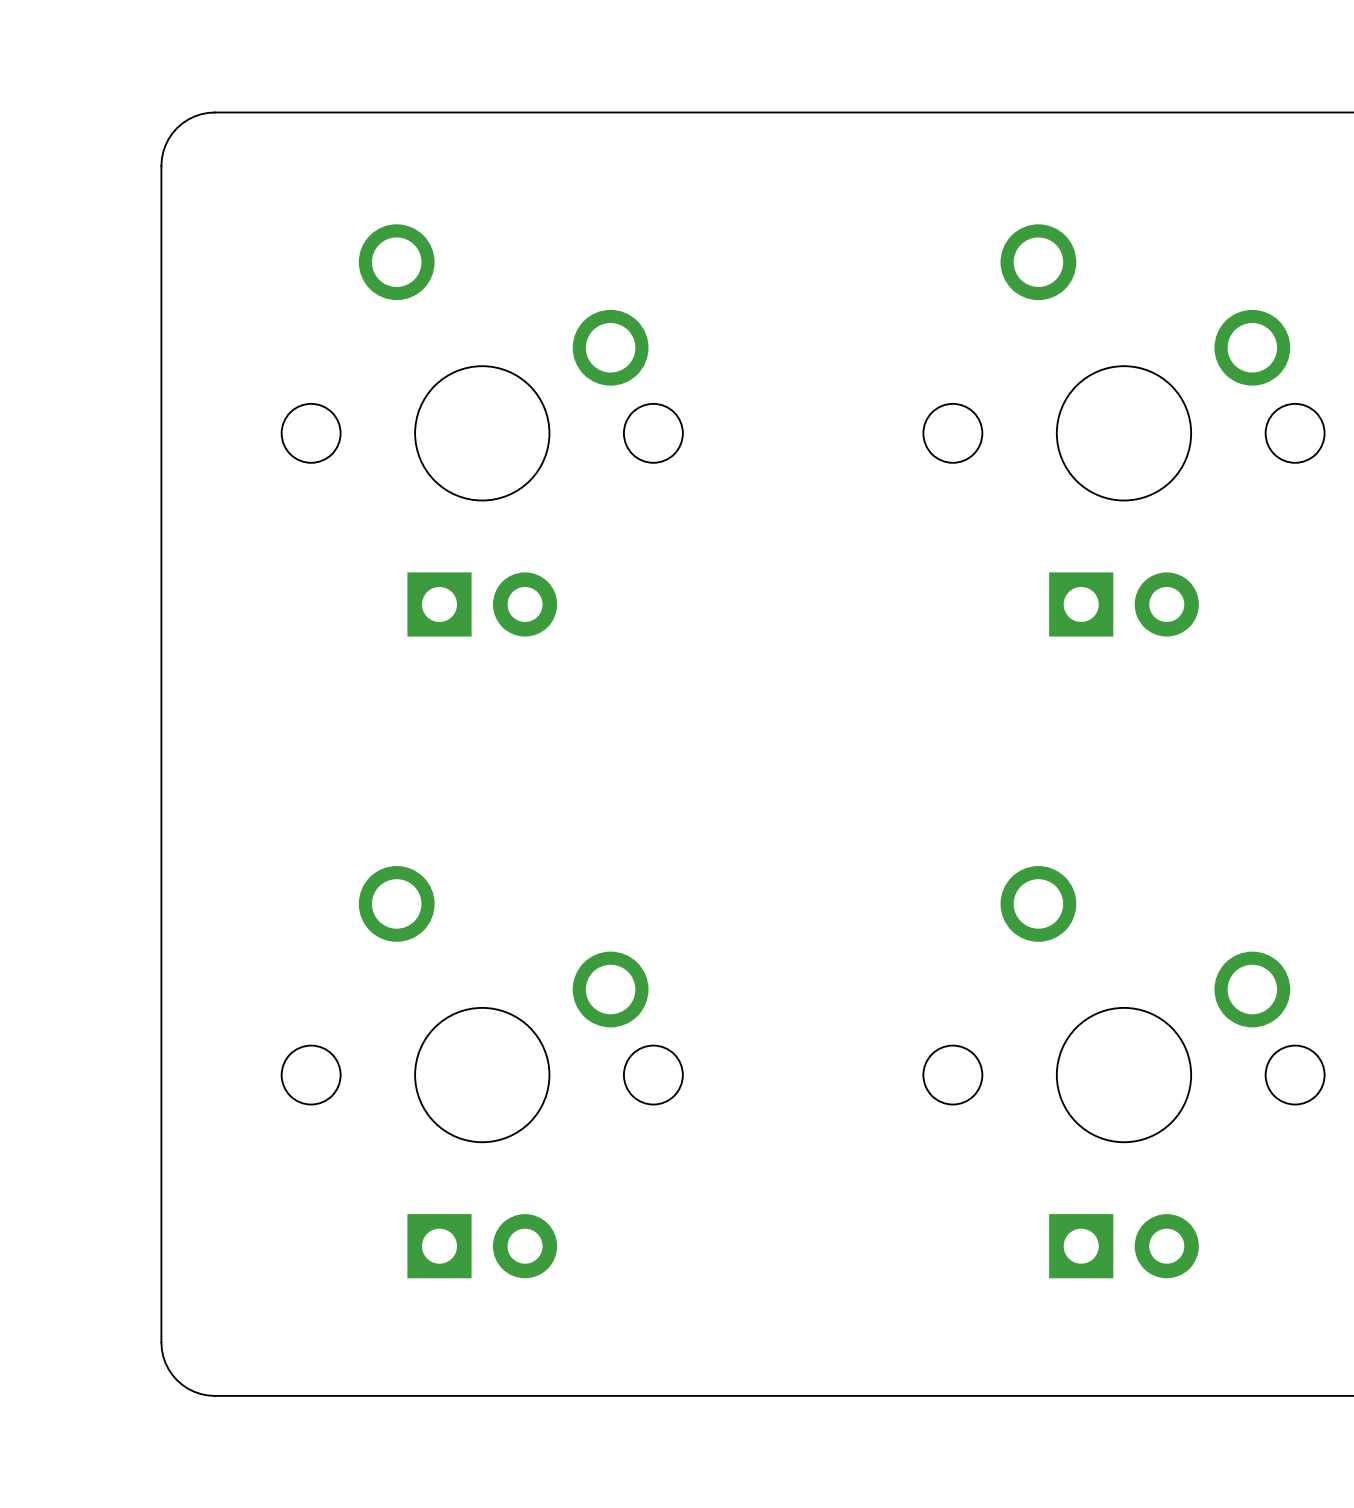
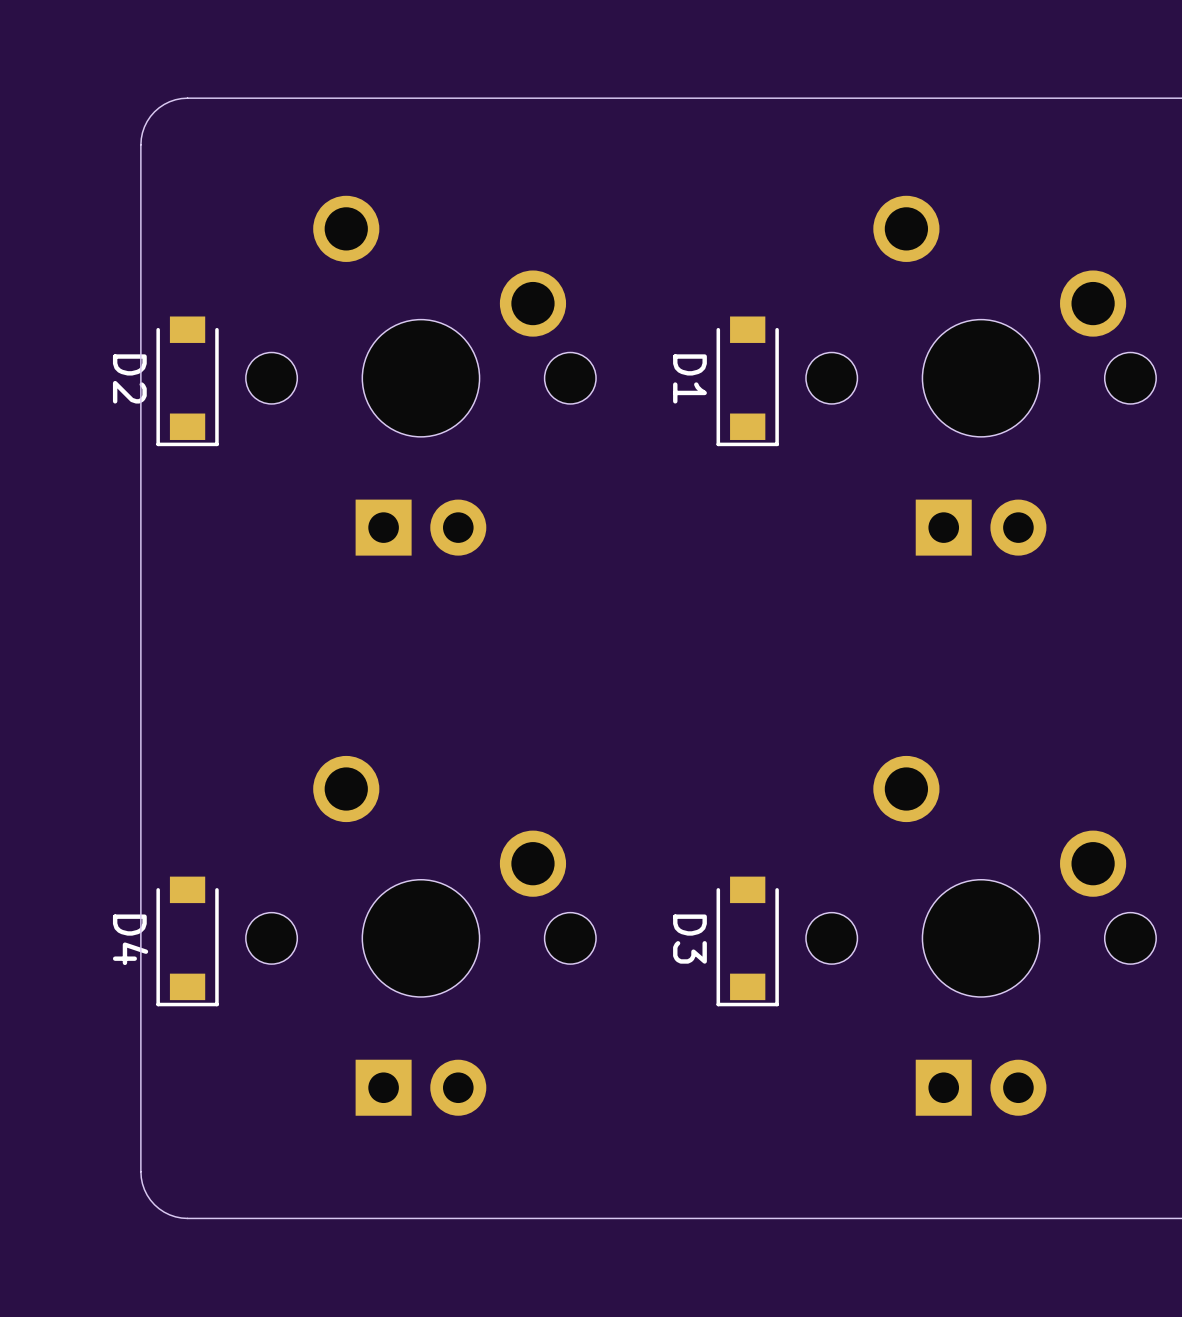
D2: none -> (187, 381)
D1: none -> (747, 381)
D4: none -> (187, 941)
D3: none -> (747, 941)

